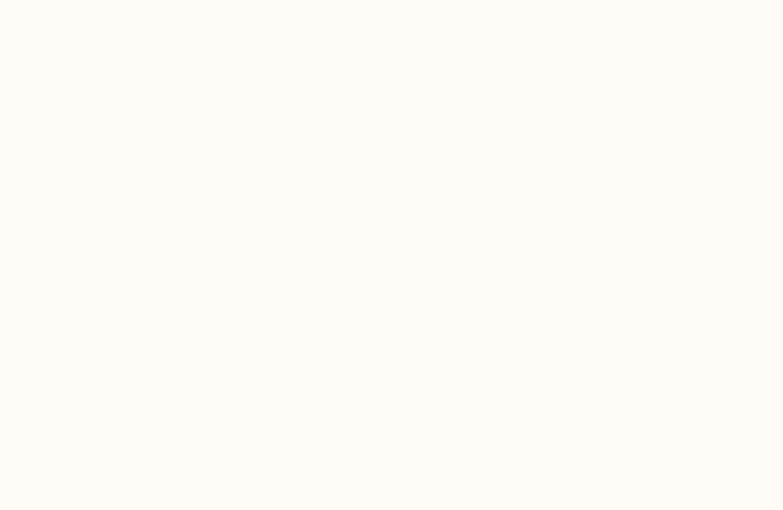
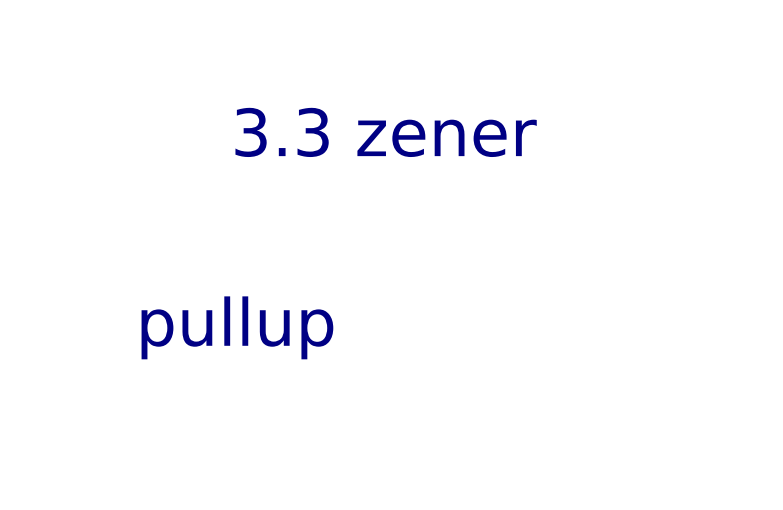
text: none -> 3.3 zener (386, 132)
text: none -> pullup (237, 327)

